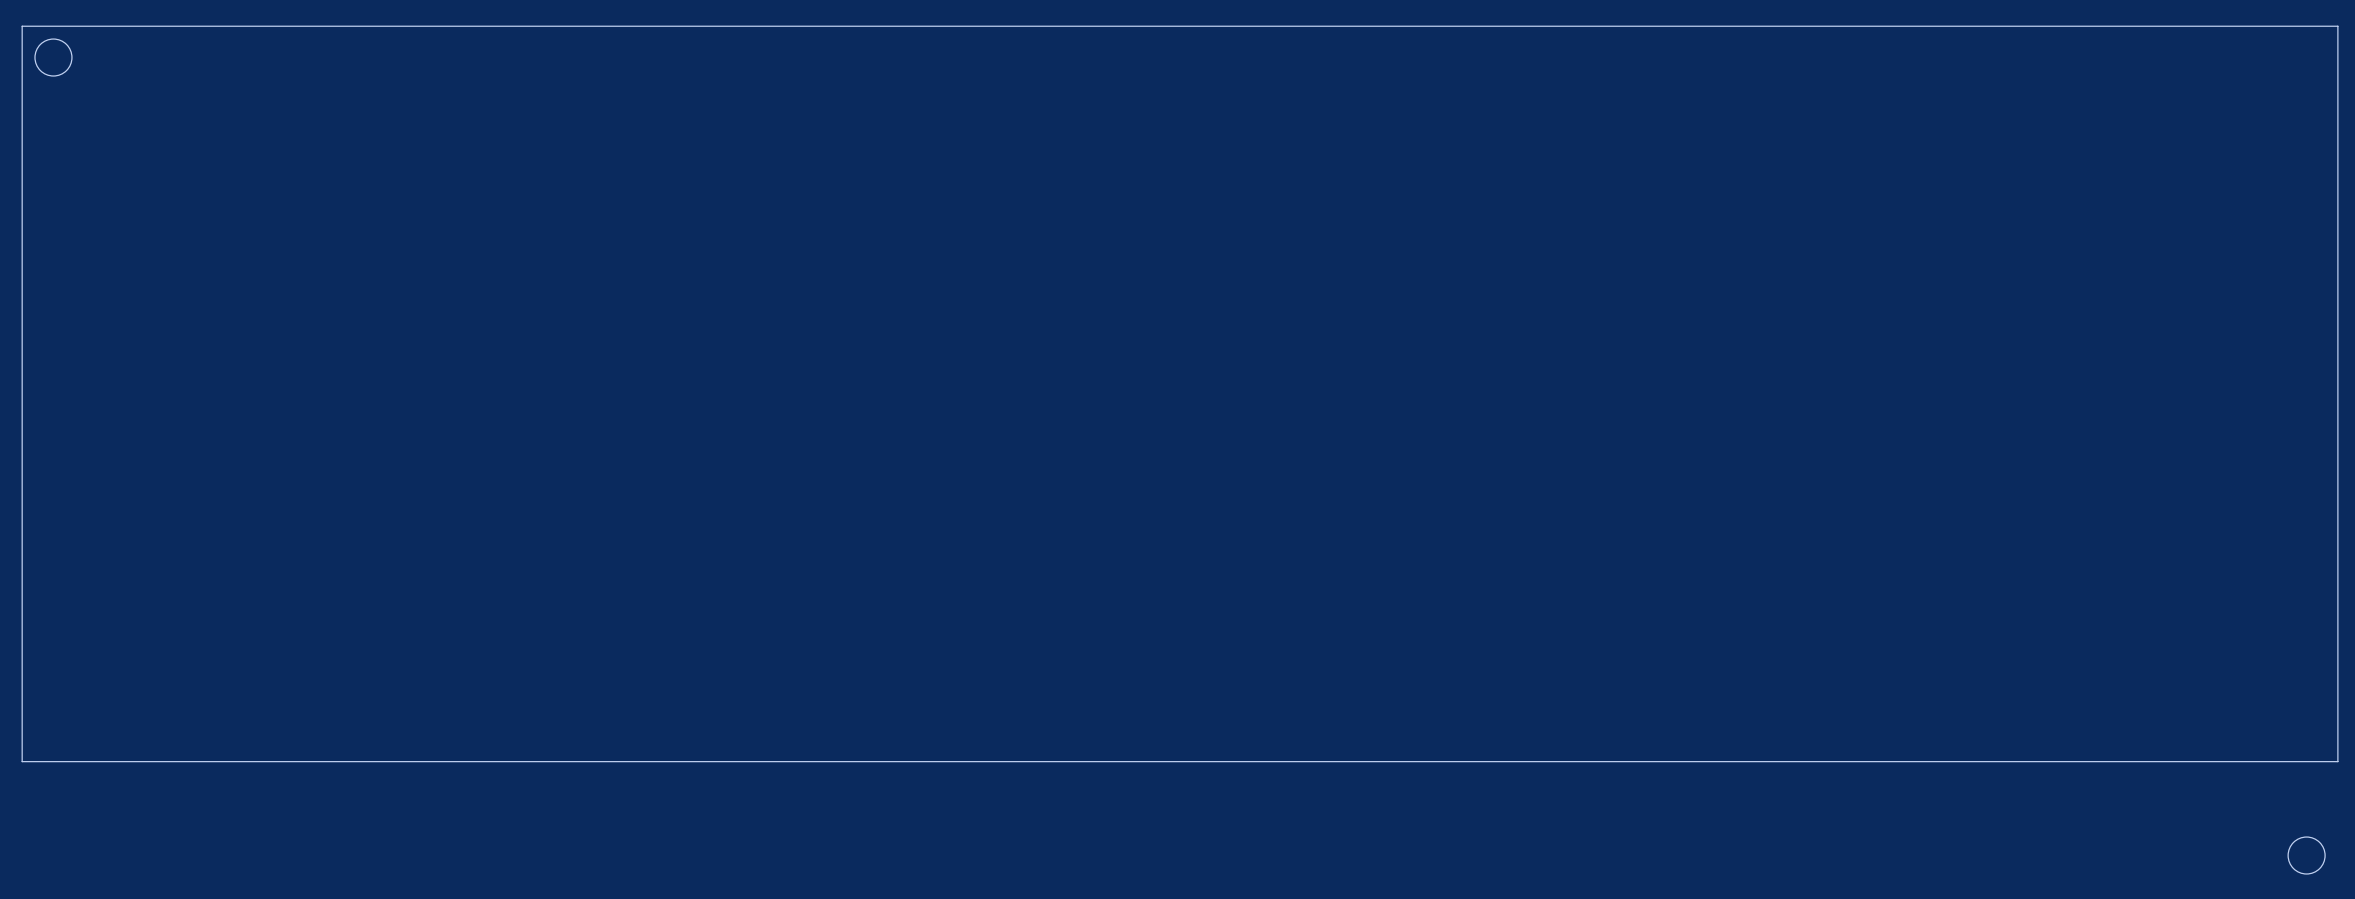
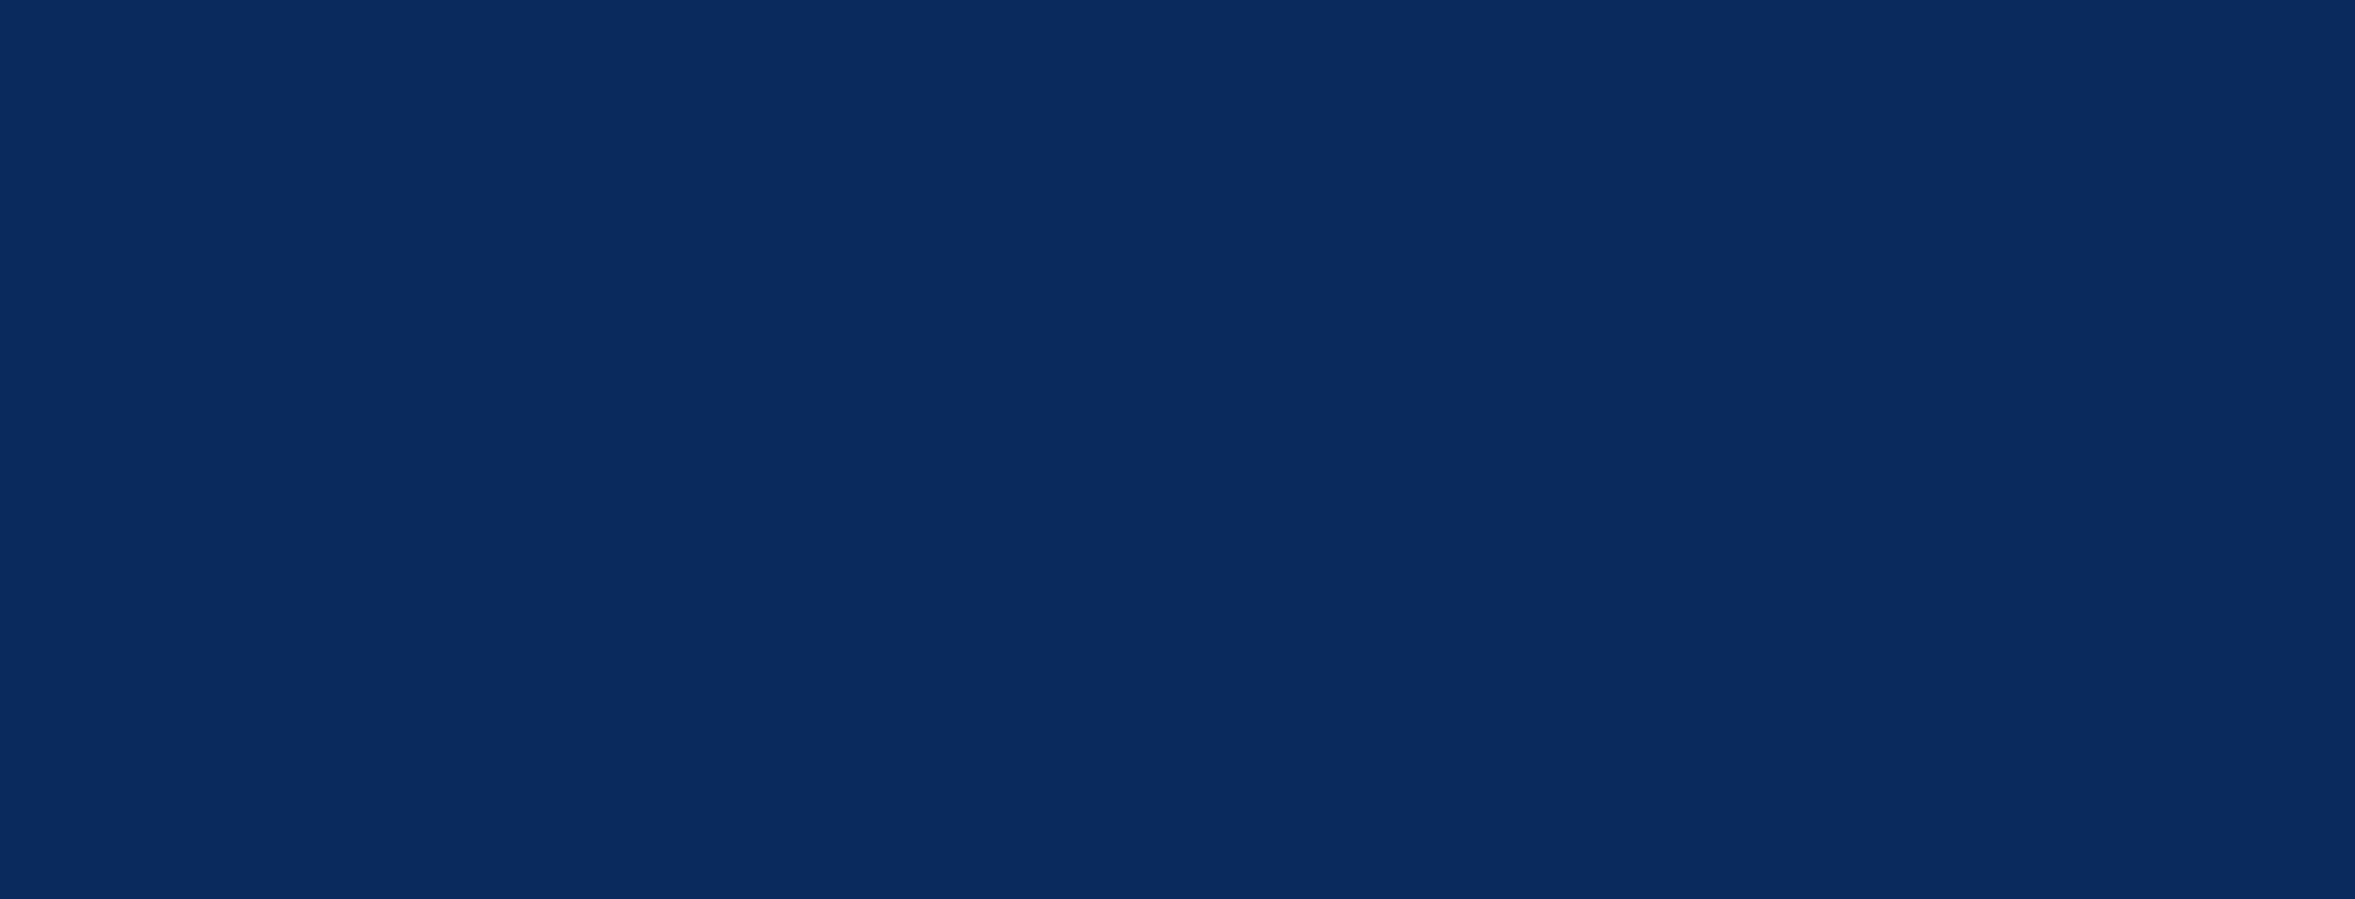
board edge: (2337, 26) (22, 26) (22, 761) (2337, 761) (2337, 26) -> none
round board edge: [34, 38, 73, 77] -> none
round board edge: [2287, 836, 2326, 875] -> none

